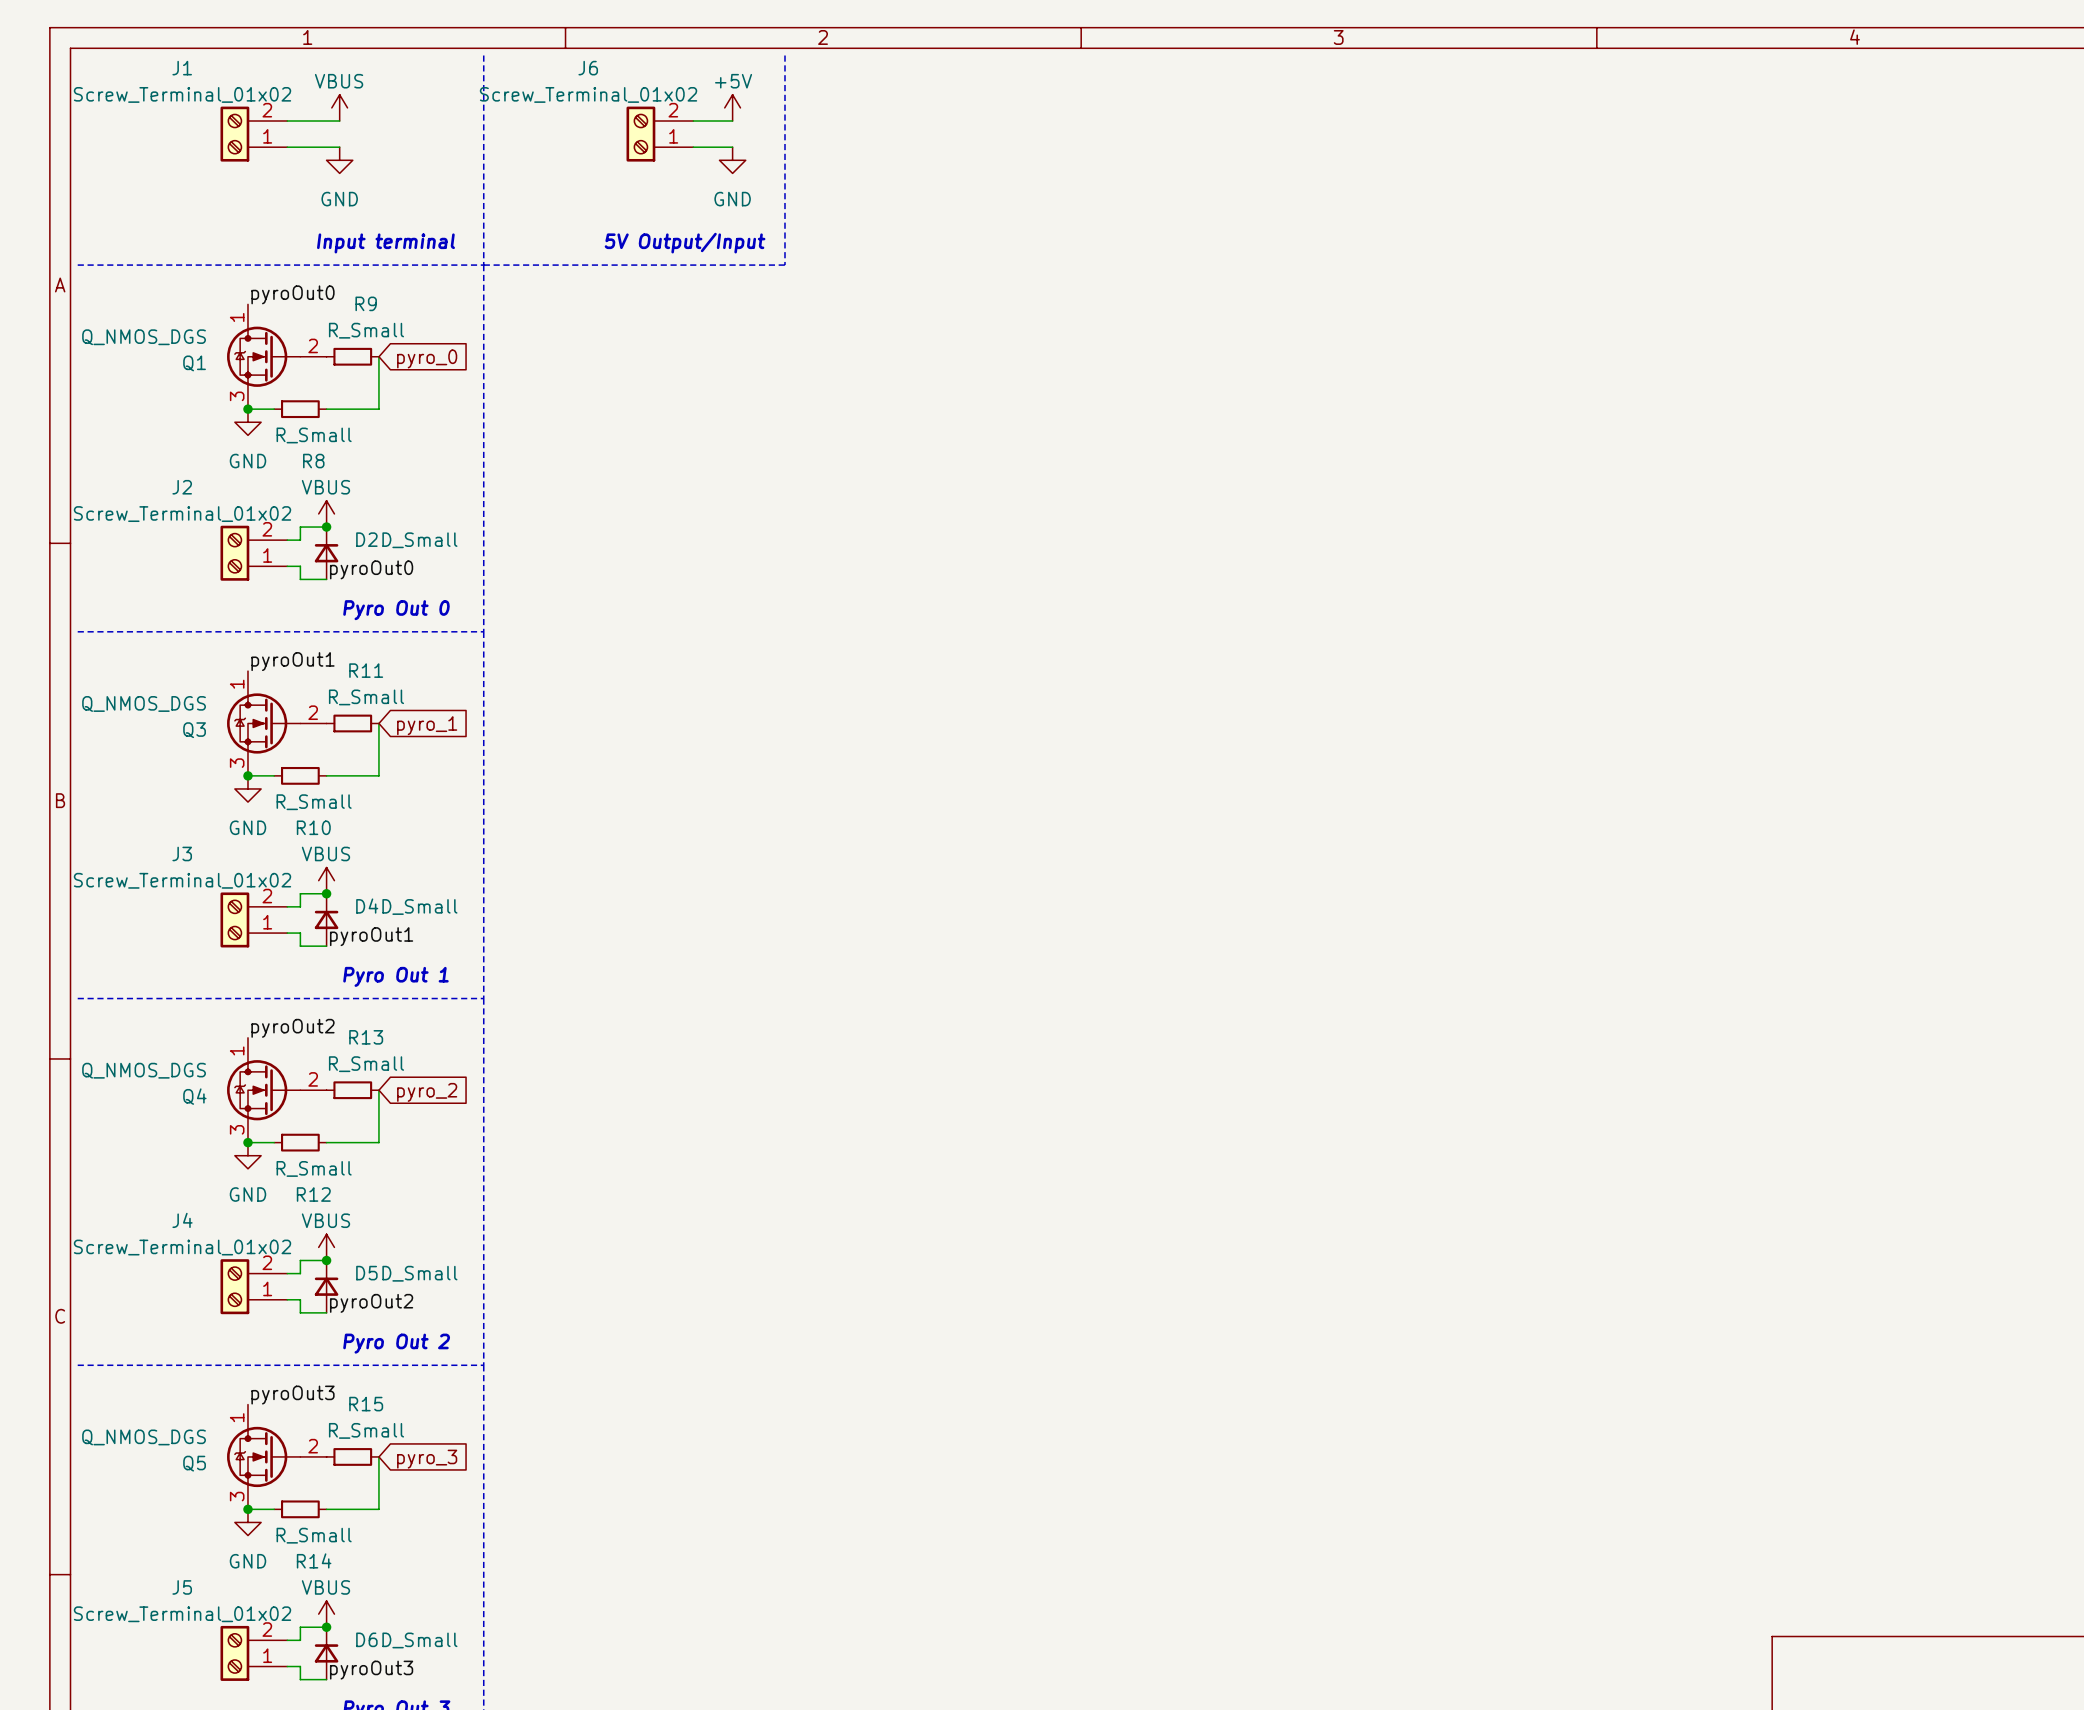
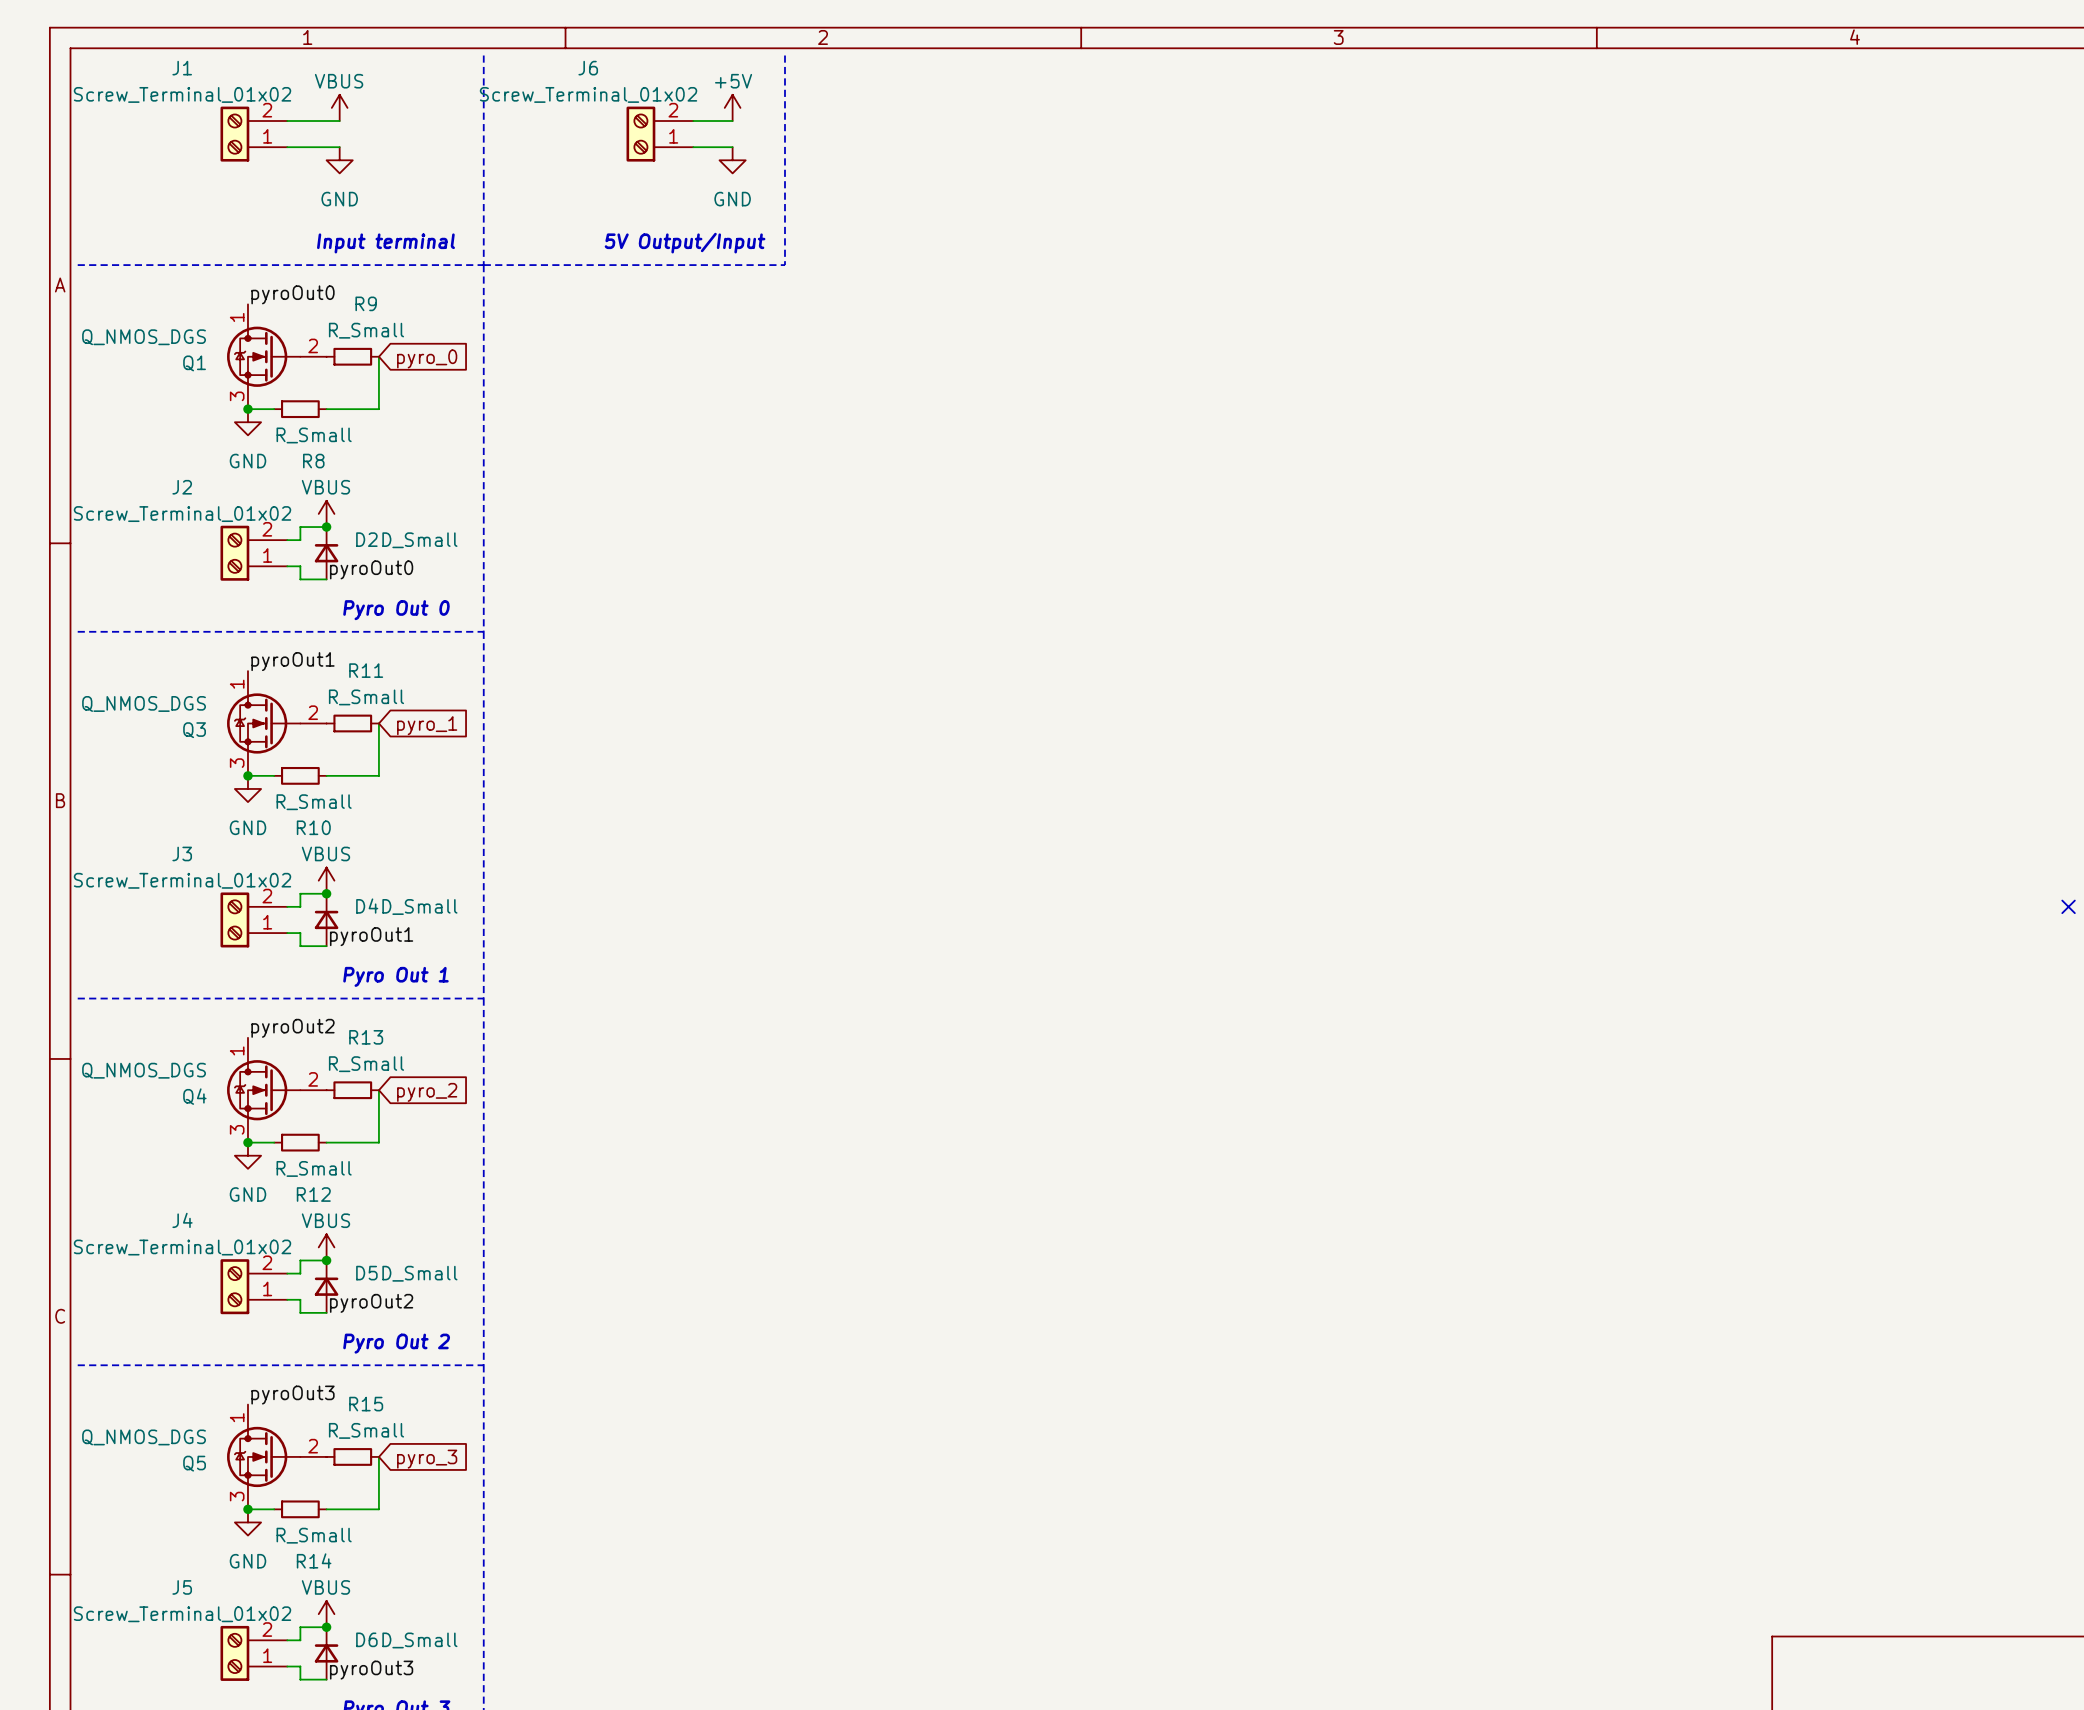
no-connect mark: none -> (2068, 906)

